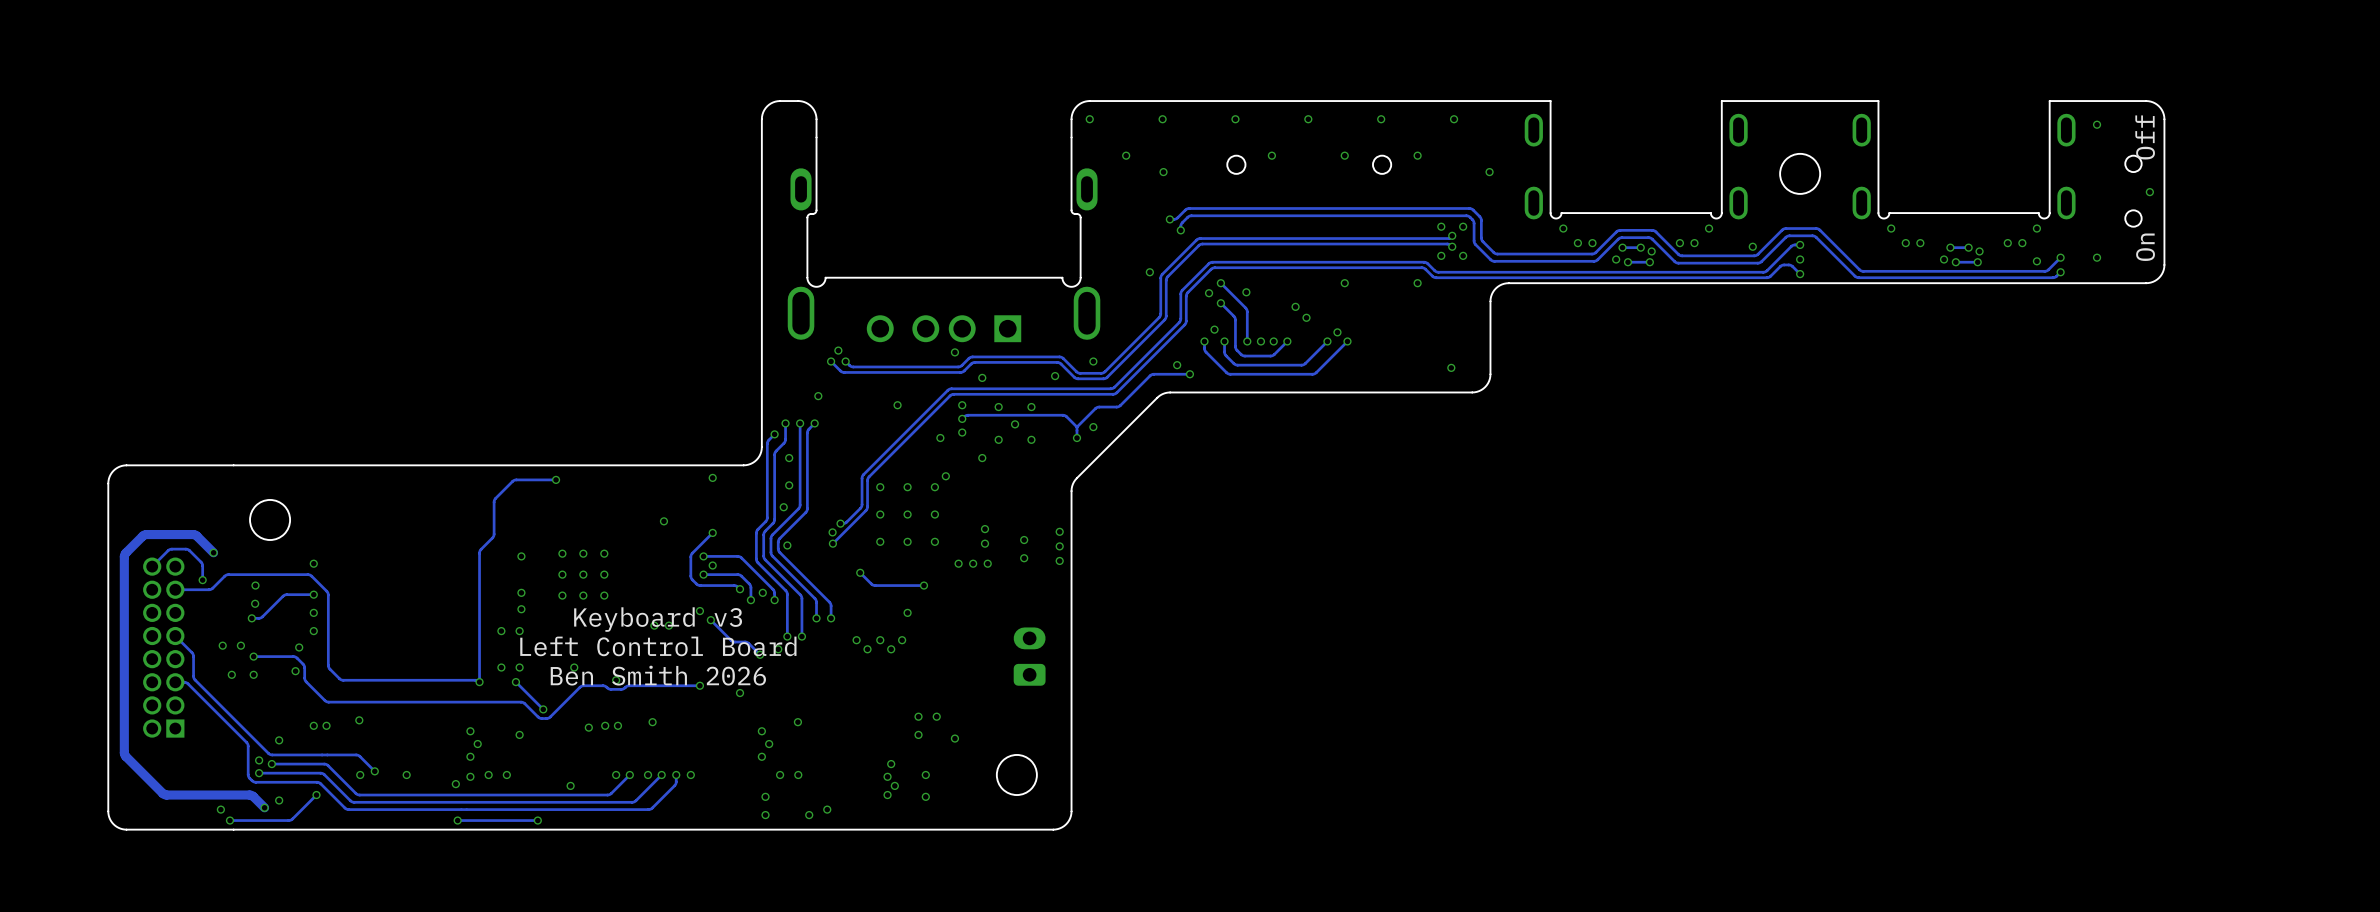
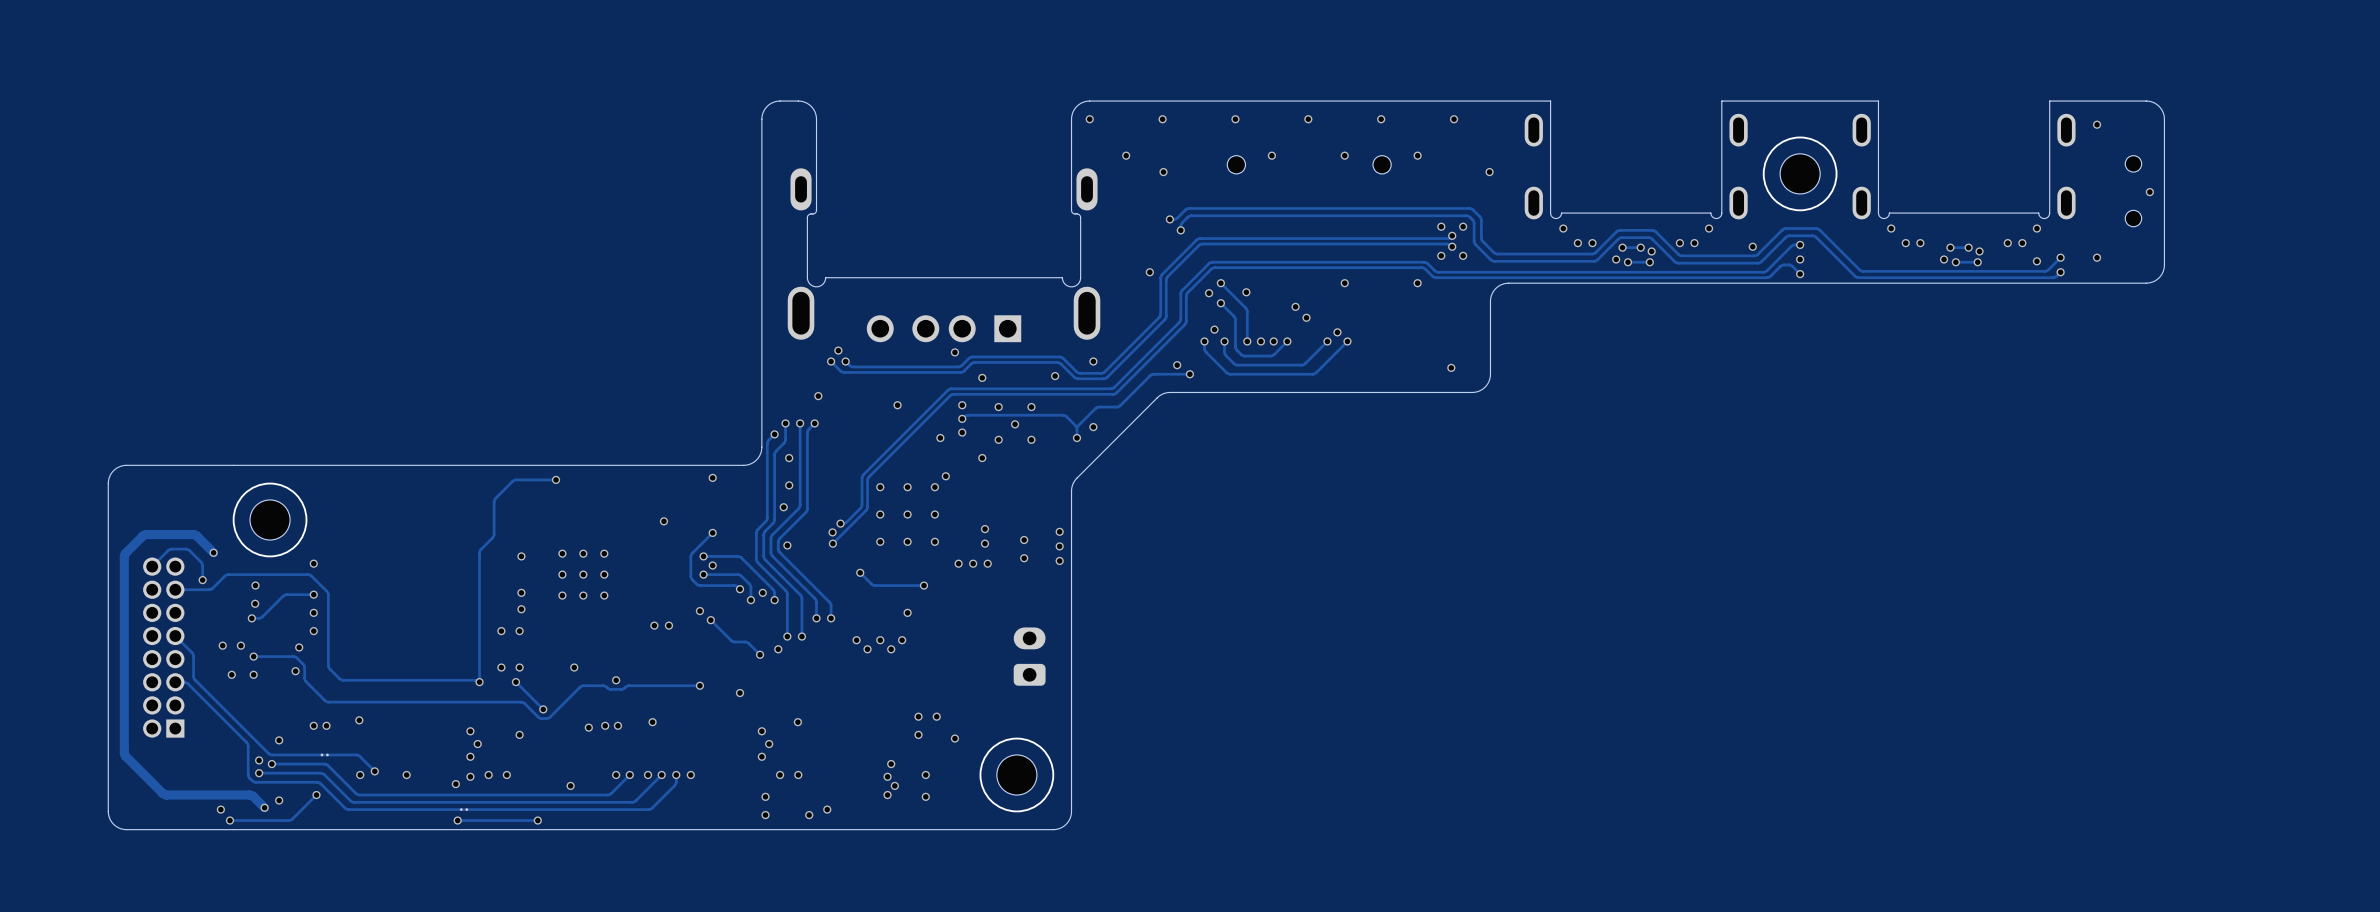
drawing: none -> [1762, 136, 1838, 212]
text: Off (2145, 137) -> none
text: On (2145, 247) -> none
drawing: none -> [232, 482, 308, 558]
text: Keyboard v3 (658, 619) -> none
text: Left Control Board (658, 646) -> none
text: Ben Smith 2026 (658, 675) -> none
drawing: none -> [979, 737, 1055, 813]

